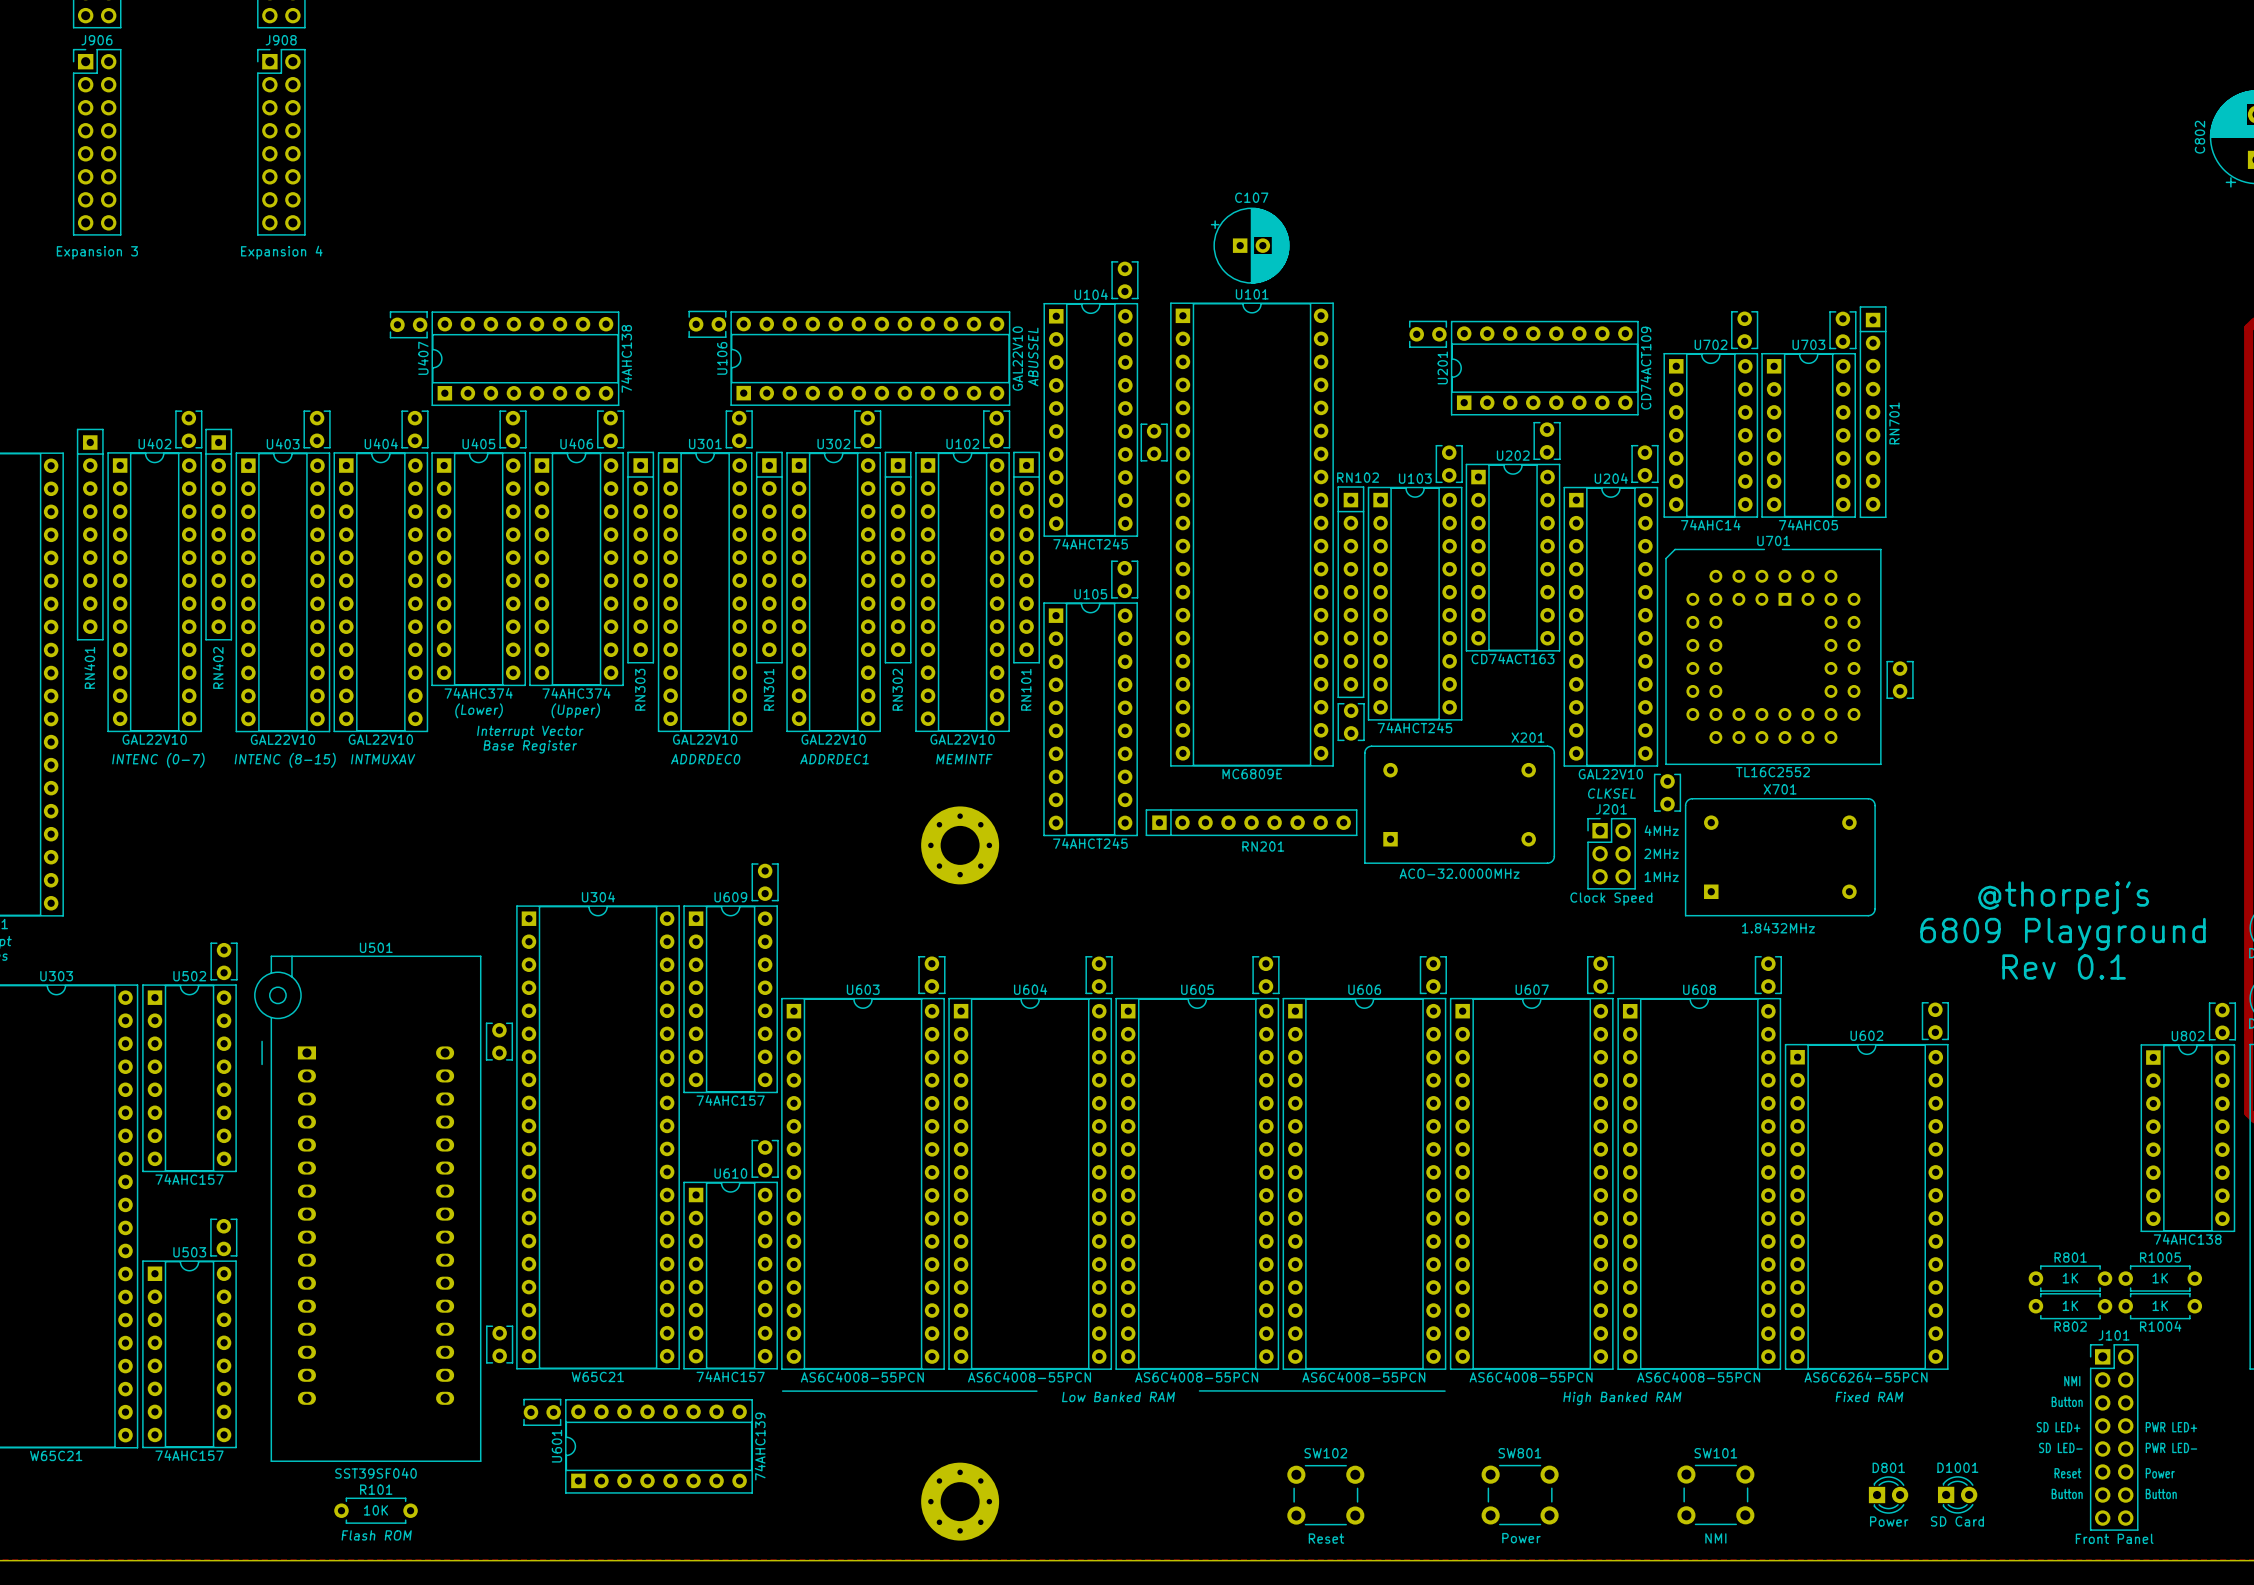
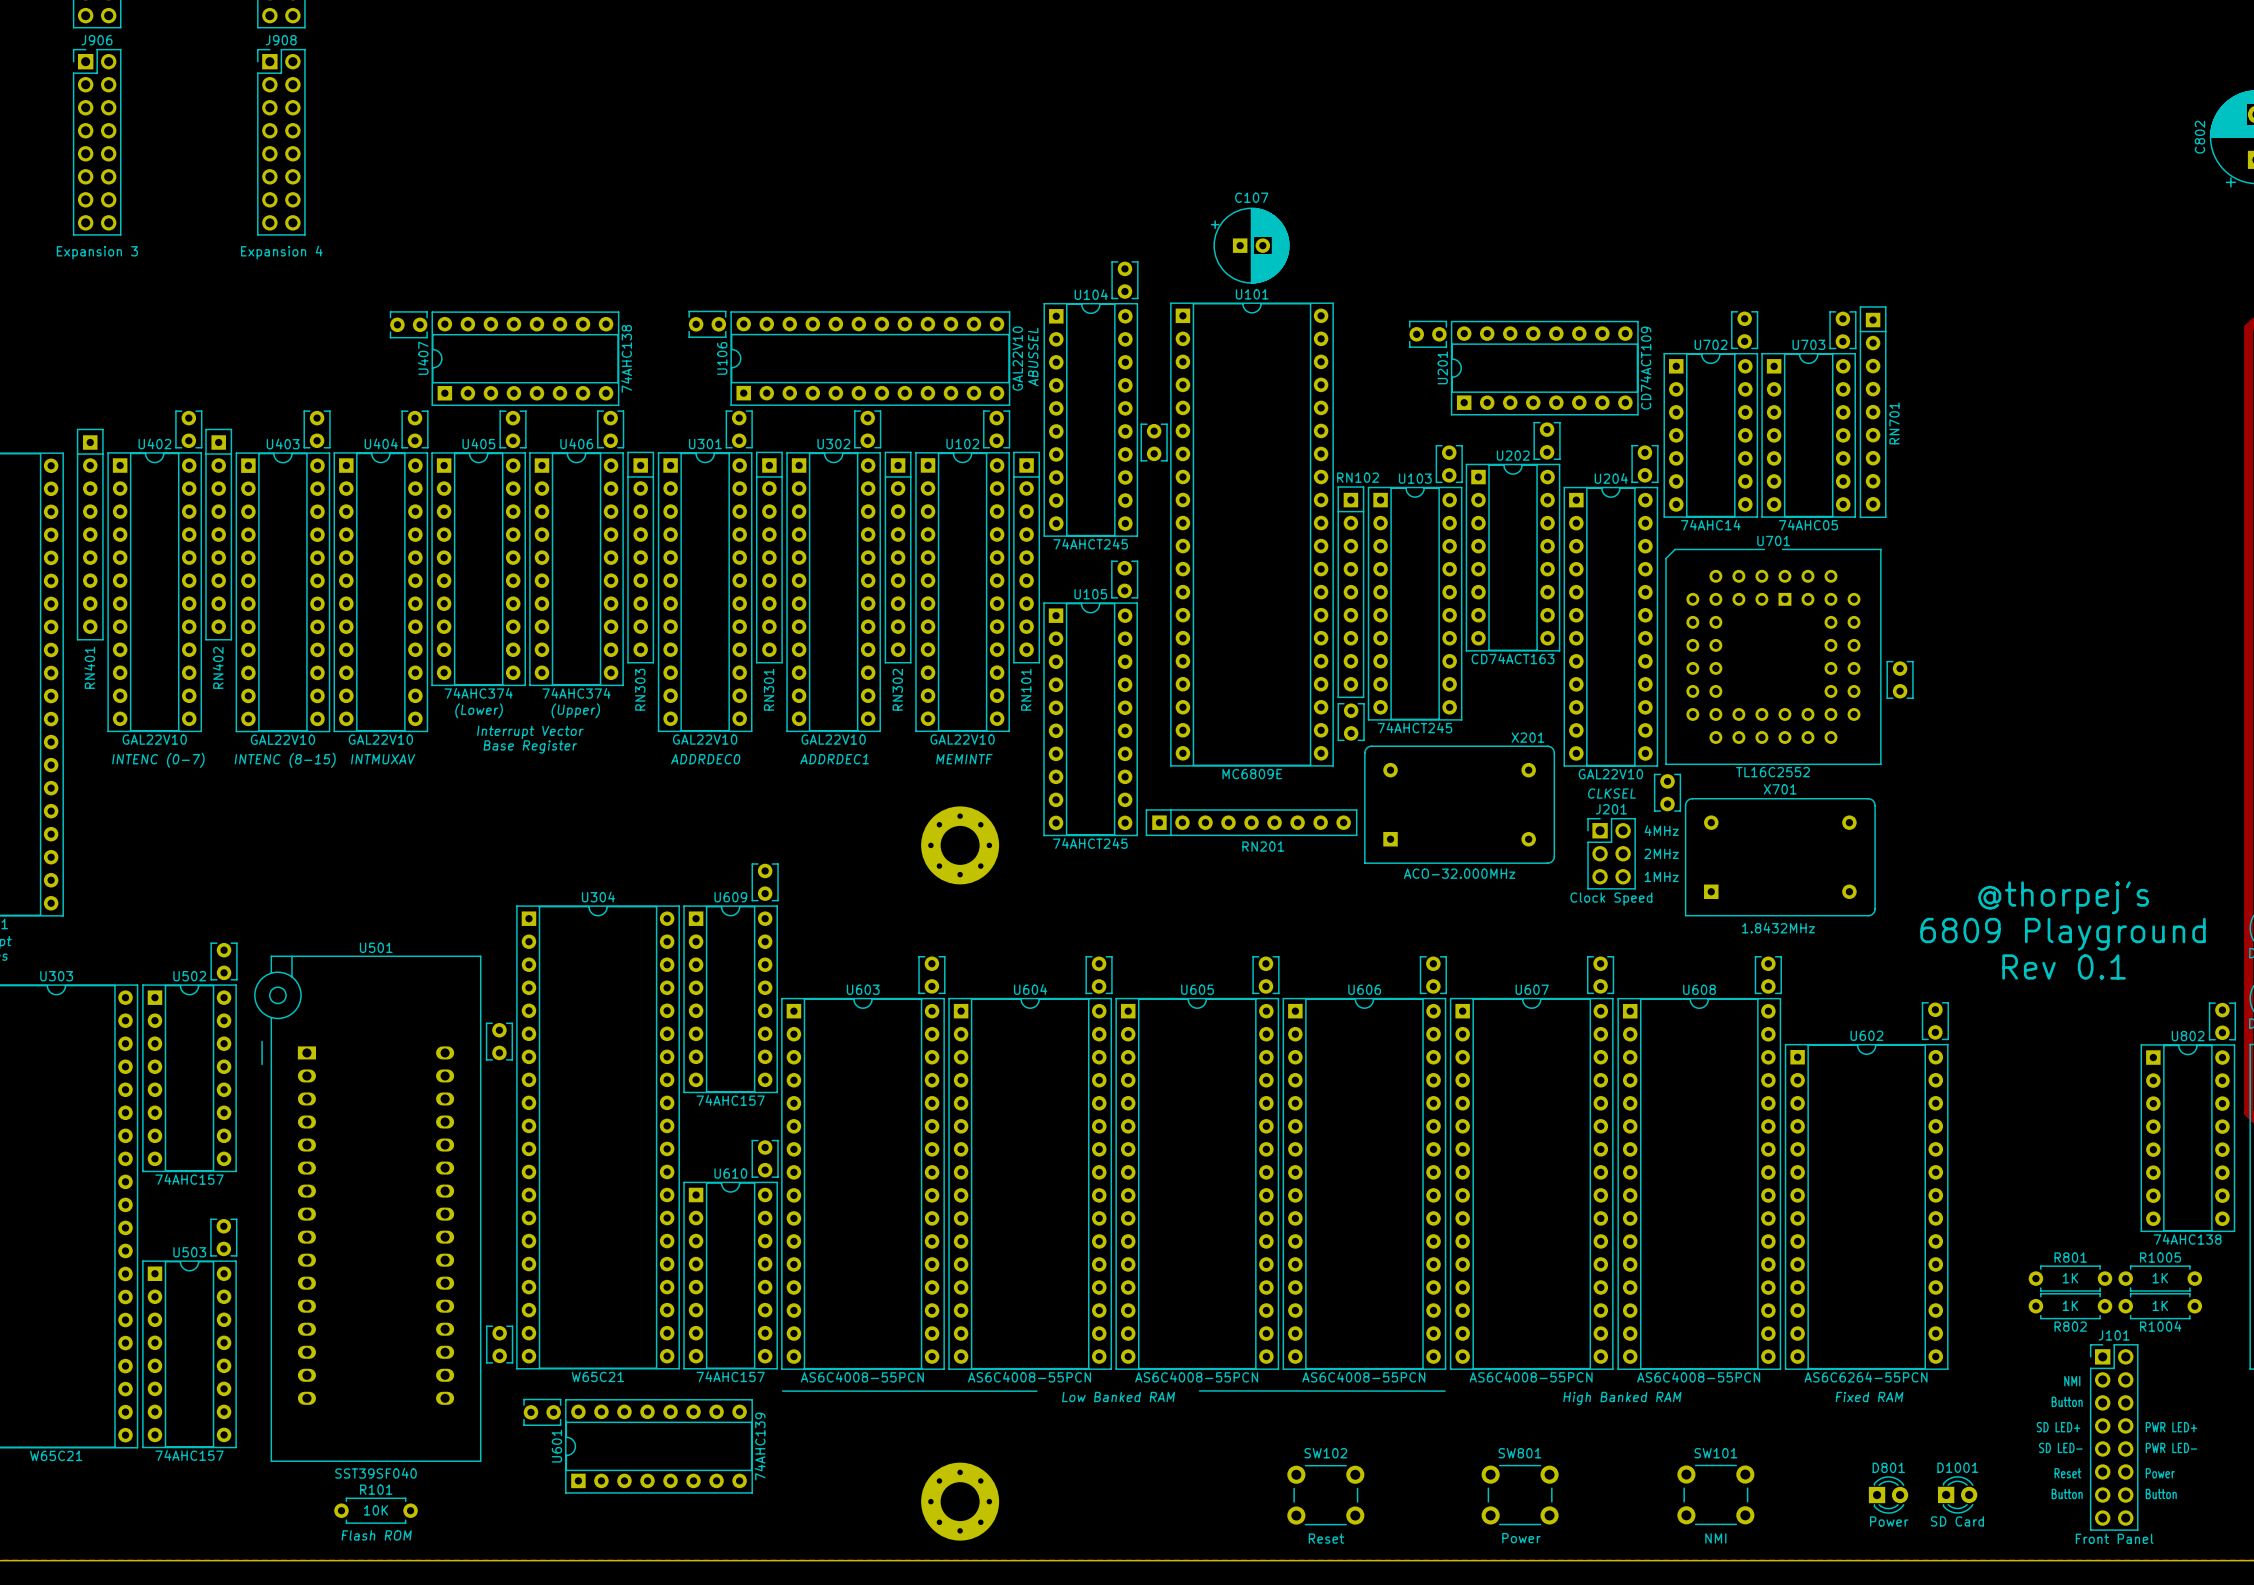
X201 value: ACO-32.0000MHz (1459, 873) -> ACO-32.000MHz (1459, 873)

